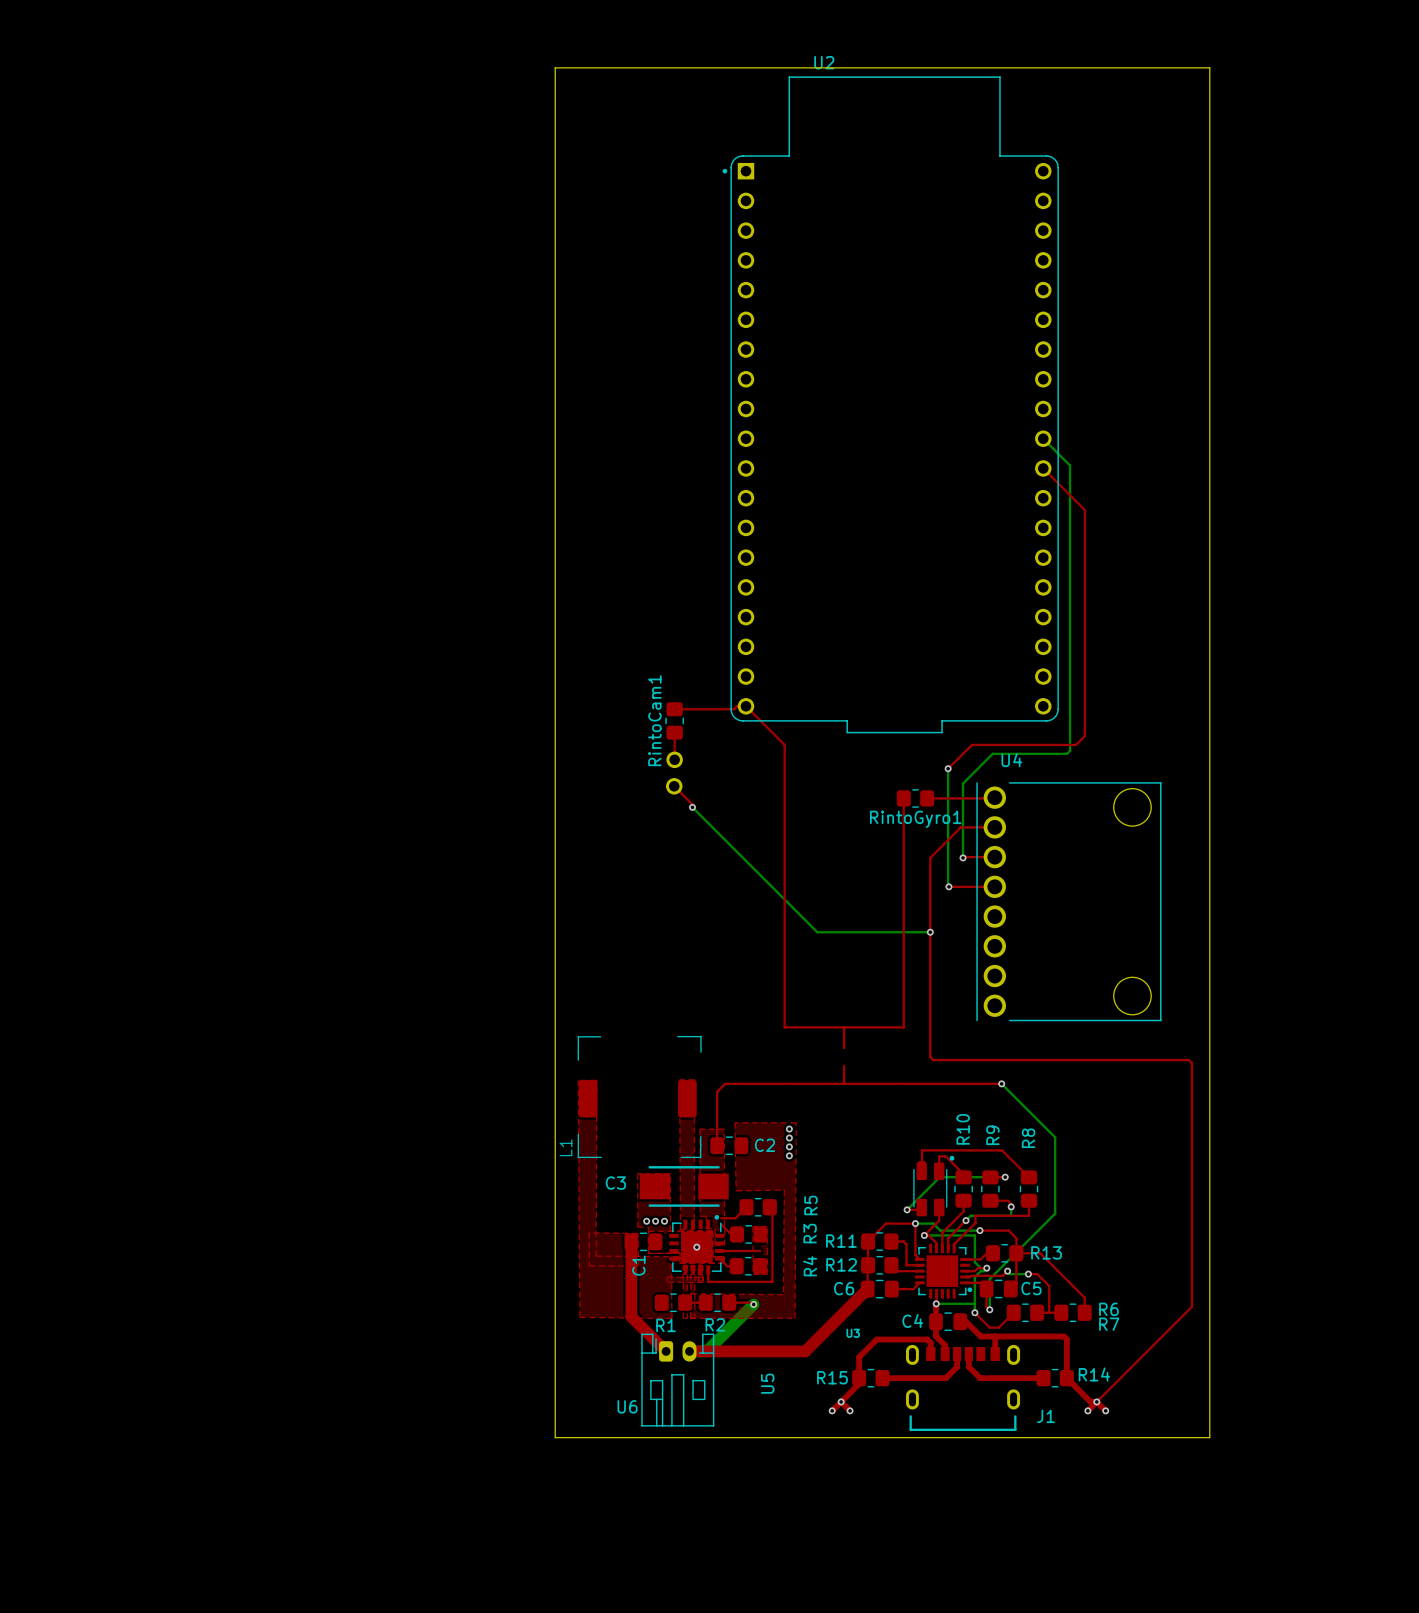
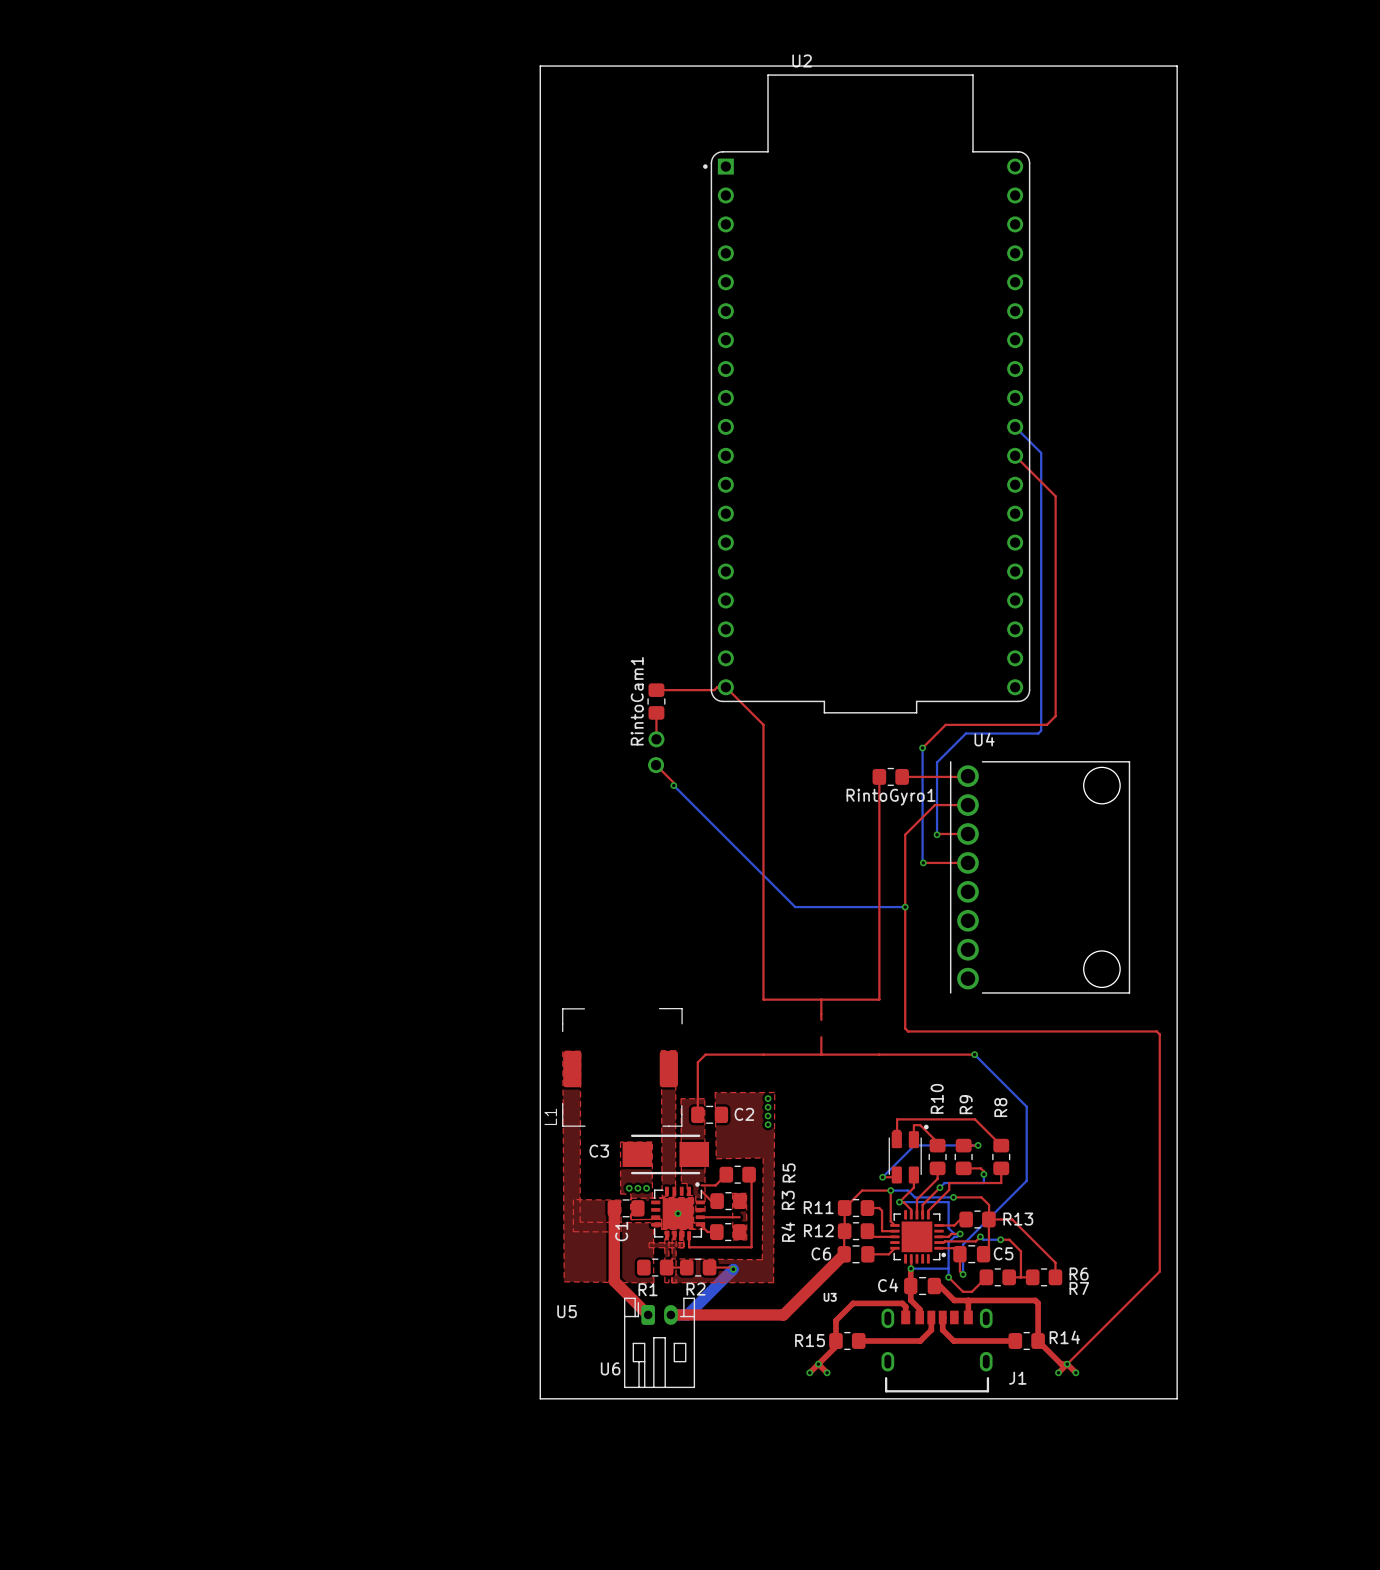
U5 name rotation: 0° (767, 1383) -> 90° clockwise (567, 1311)
U5 name position: U5 (767, 1383) -> U5 (567, 1311)

